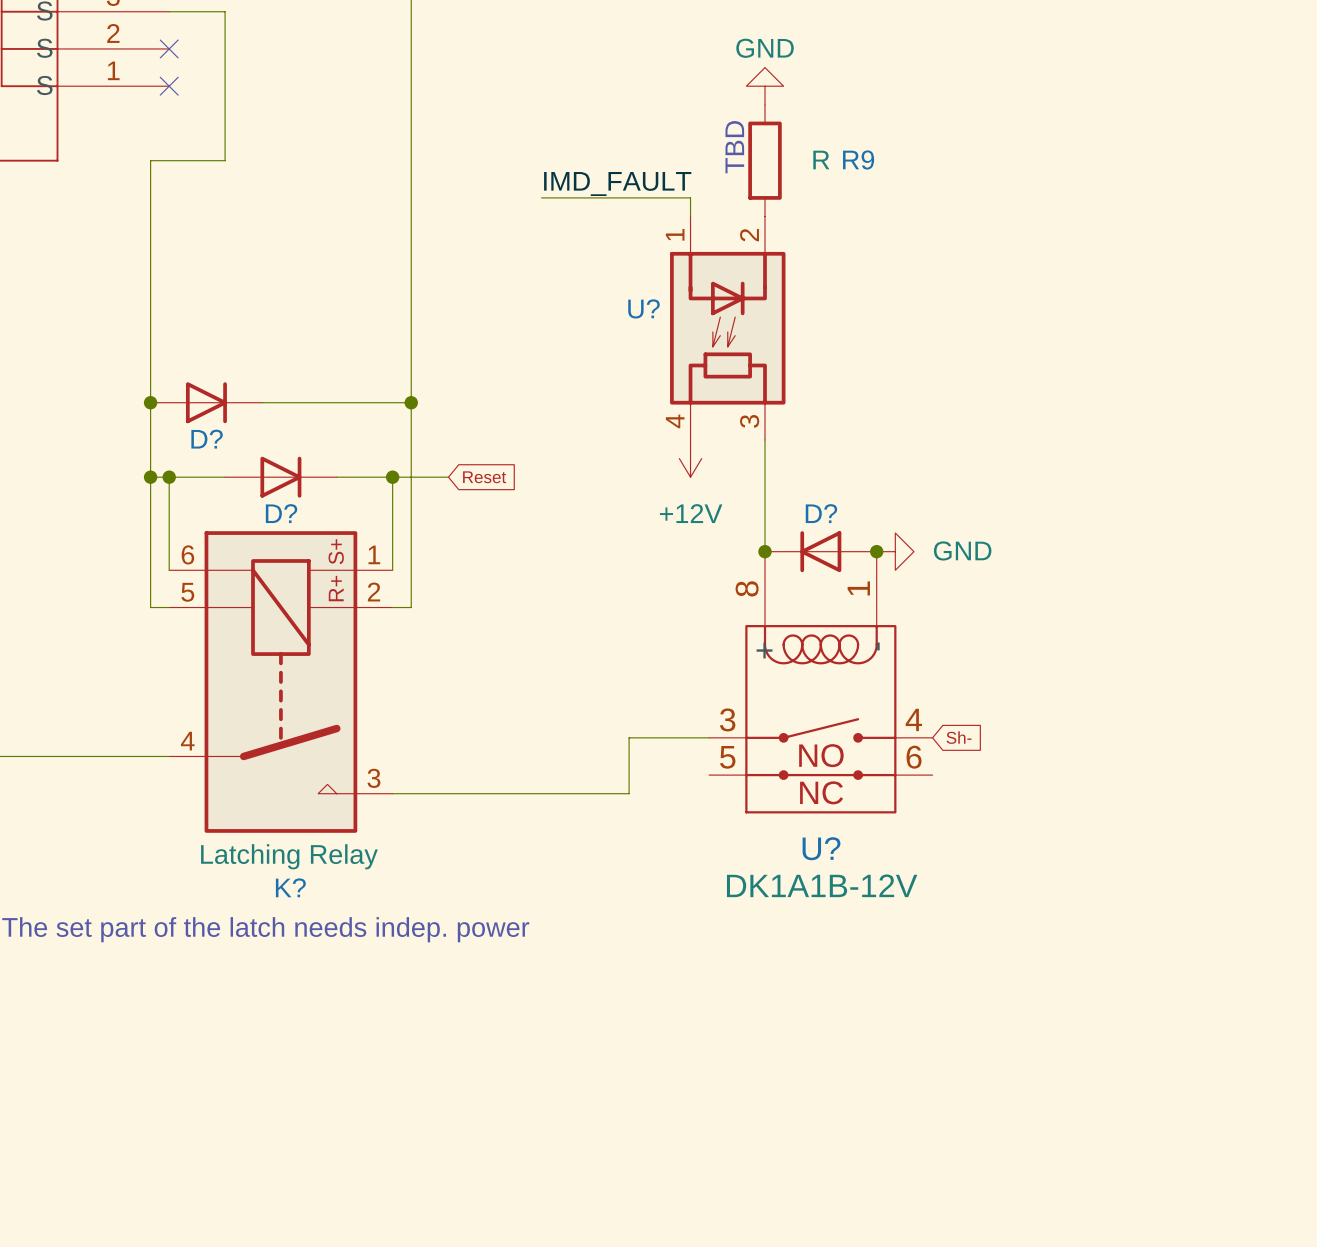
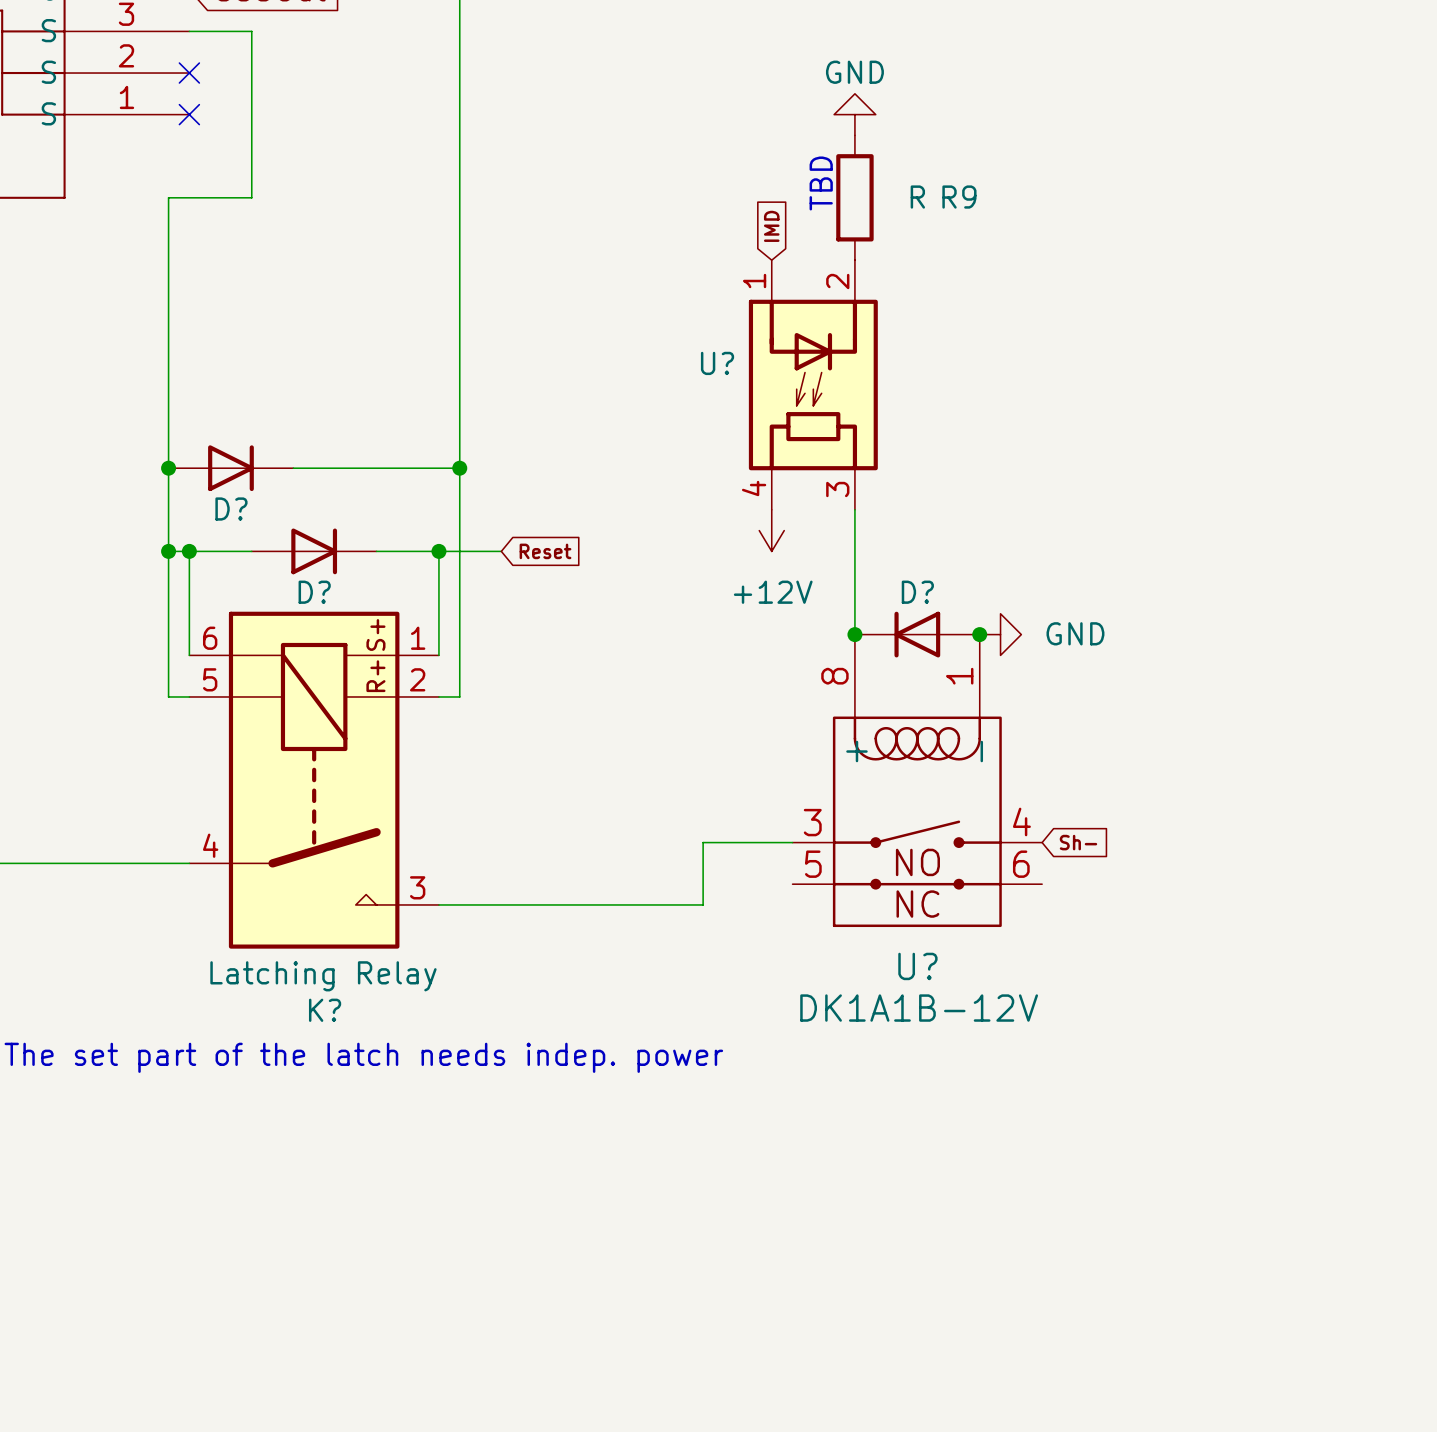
label: IMD_FAULT (617, 183) -> none
global label: none -> IMD (771, 226)
wire: (541, 197) (690, 197) (690, 216) -> none

